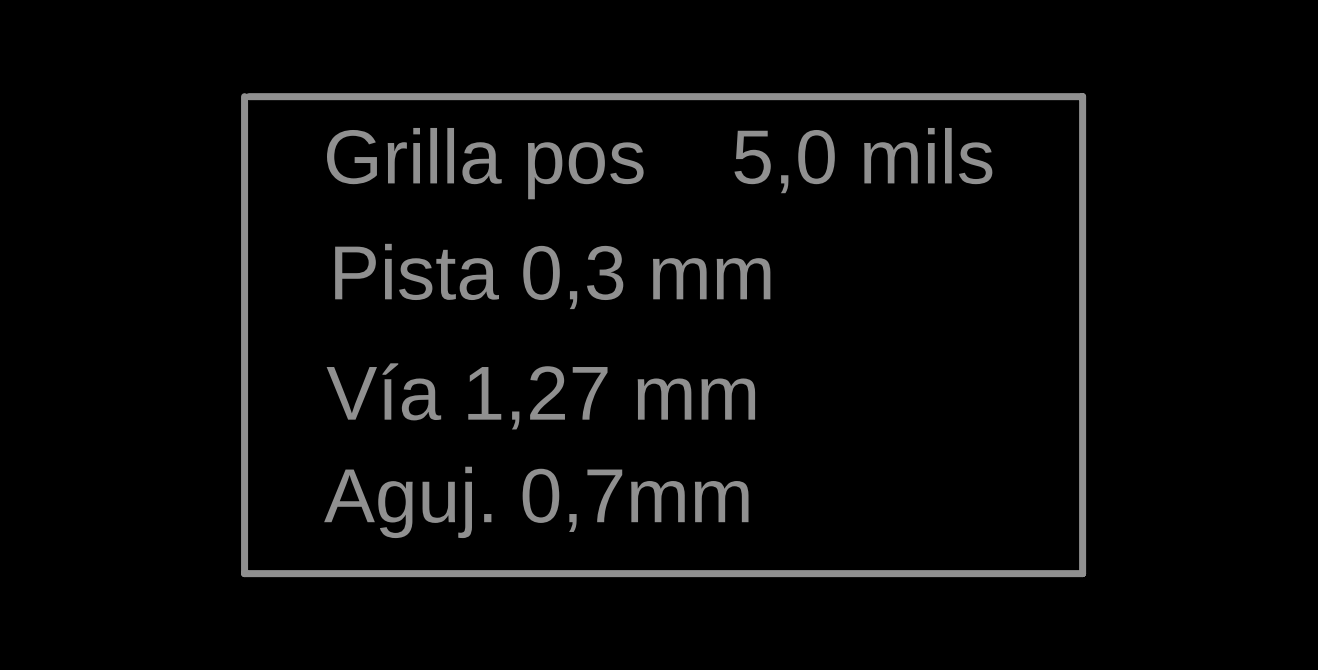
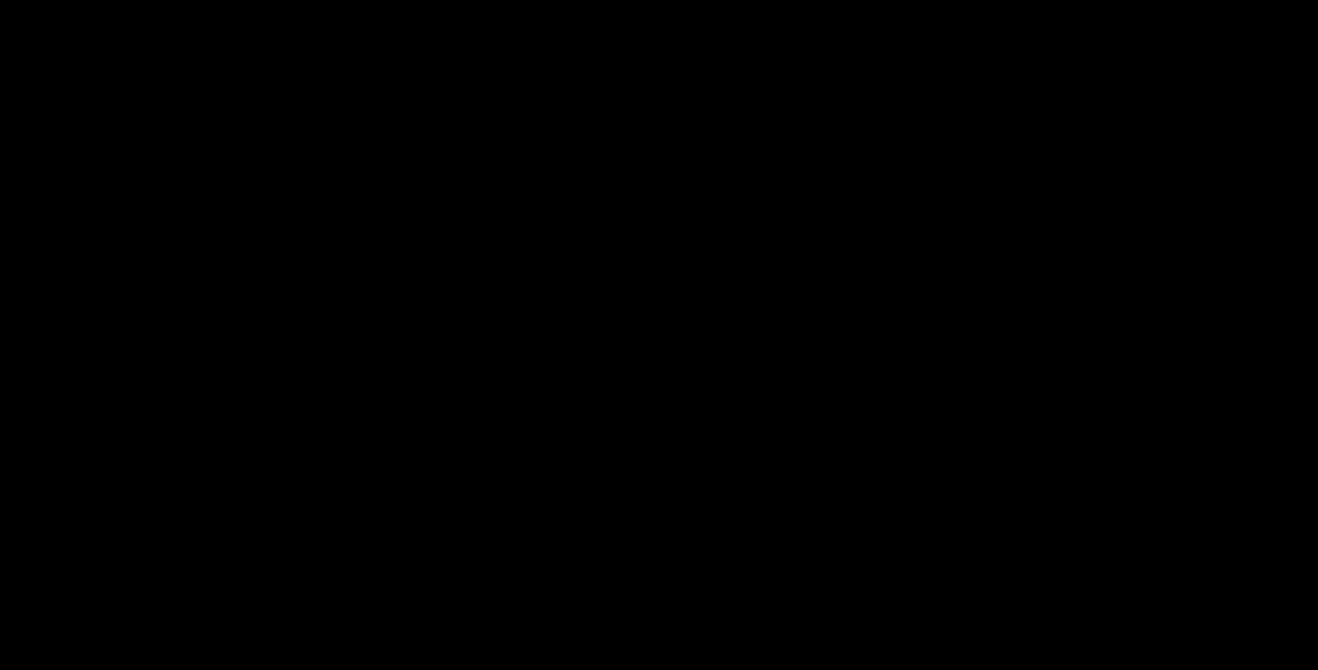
line: (244, 96) (244, 573) (1082, 573) (1082, 96) (249, 96) -> none
text: Grilla pos 5,0 mils (659, 163) -> none
text: Pista 0,3 mm (552, 276) -> none
text: Vía 1,27 mm (540, 396) -> none
text: Aguj. 0,7mm (536, 502) -> none

